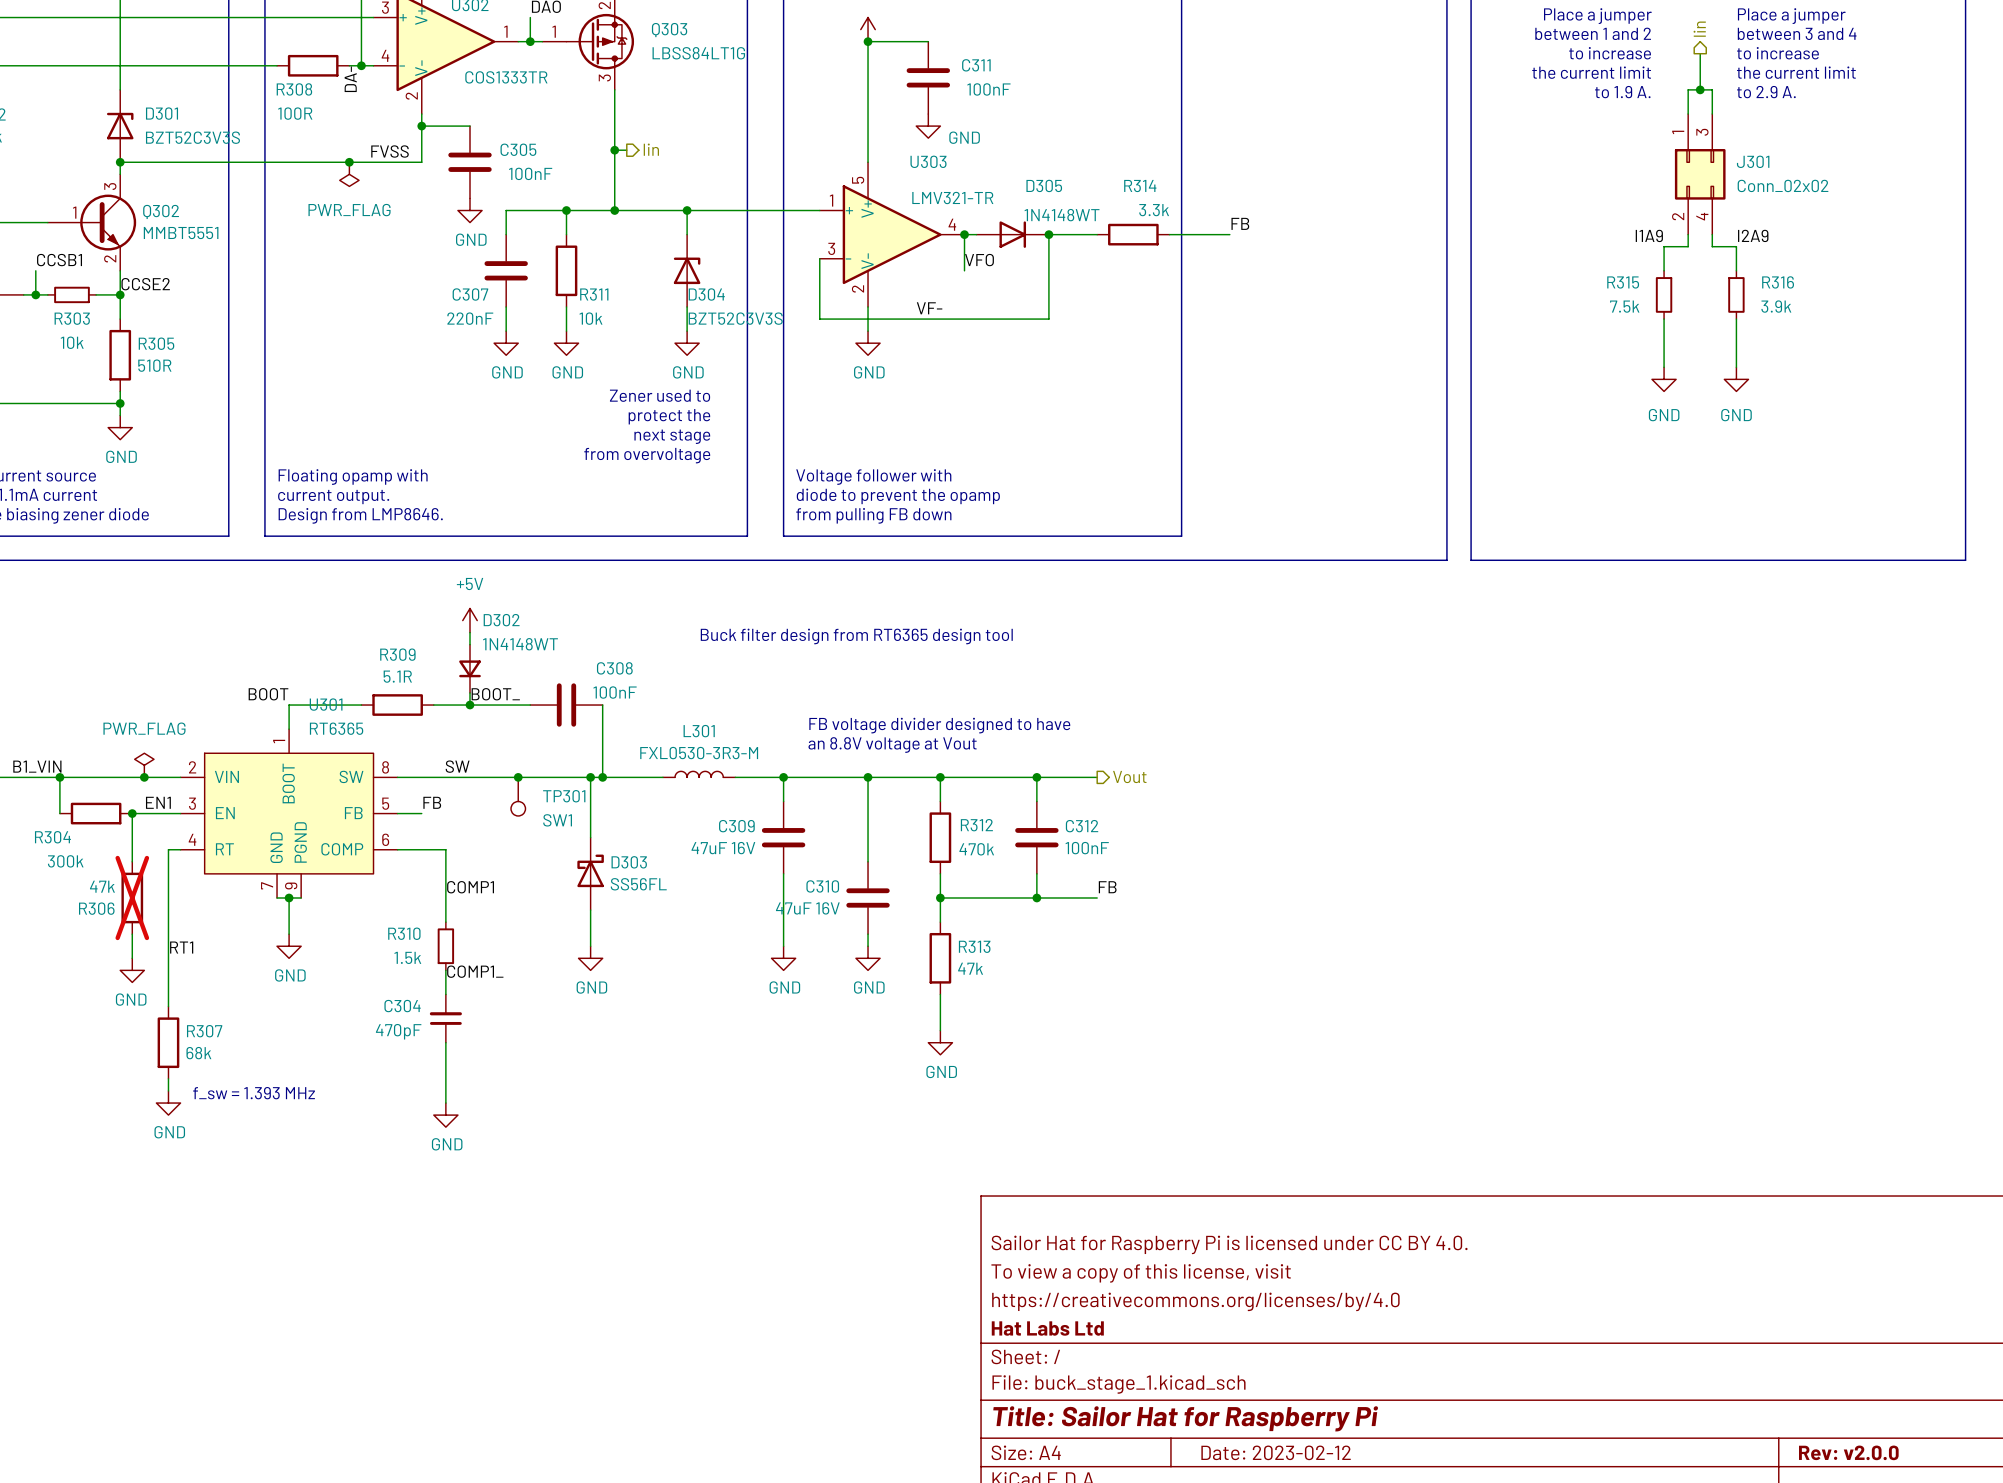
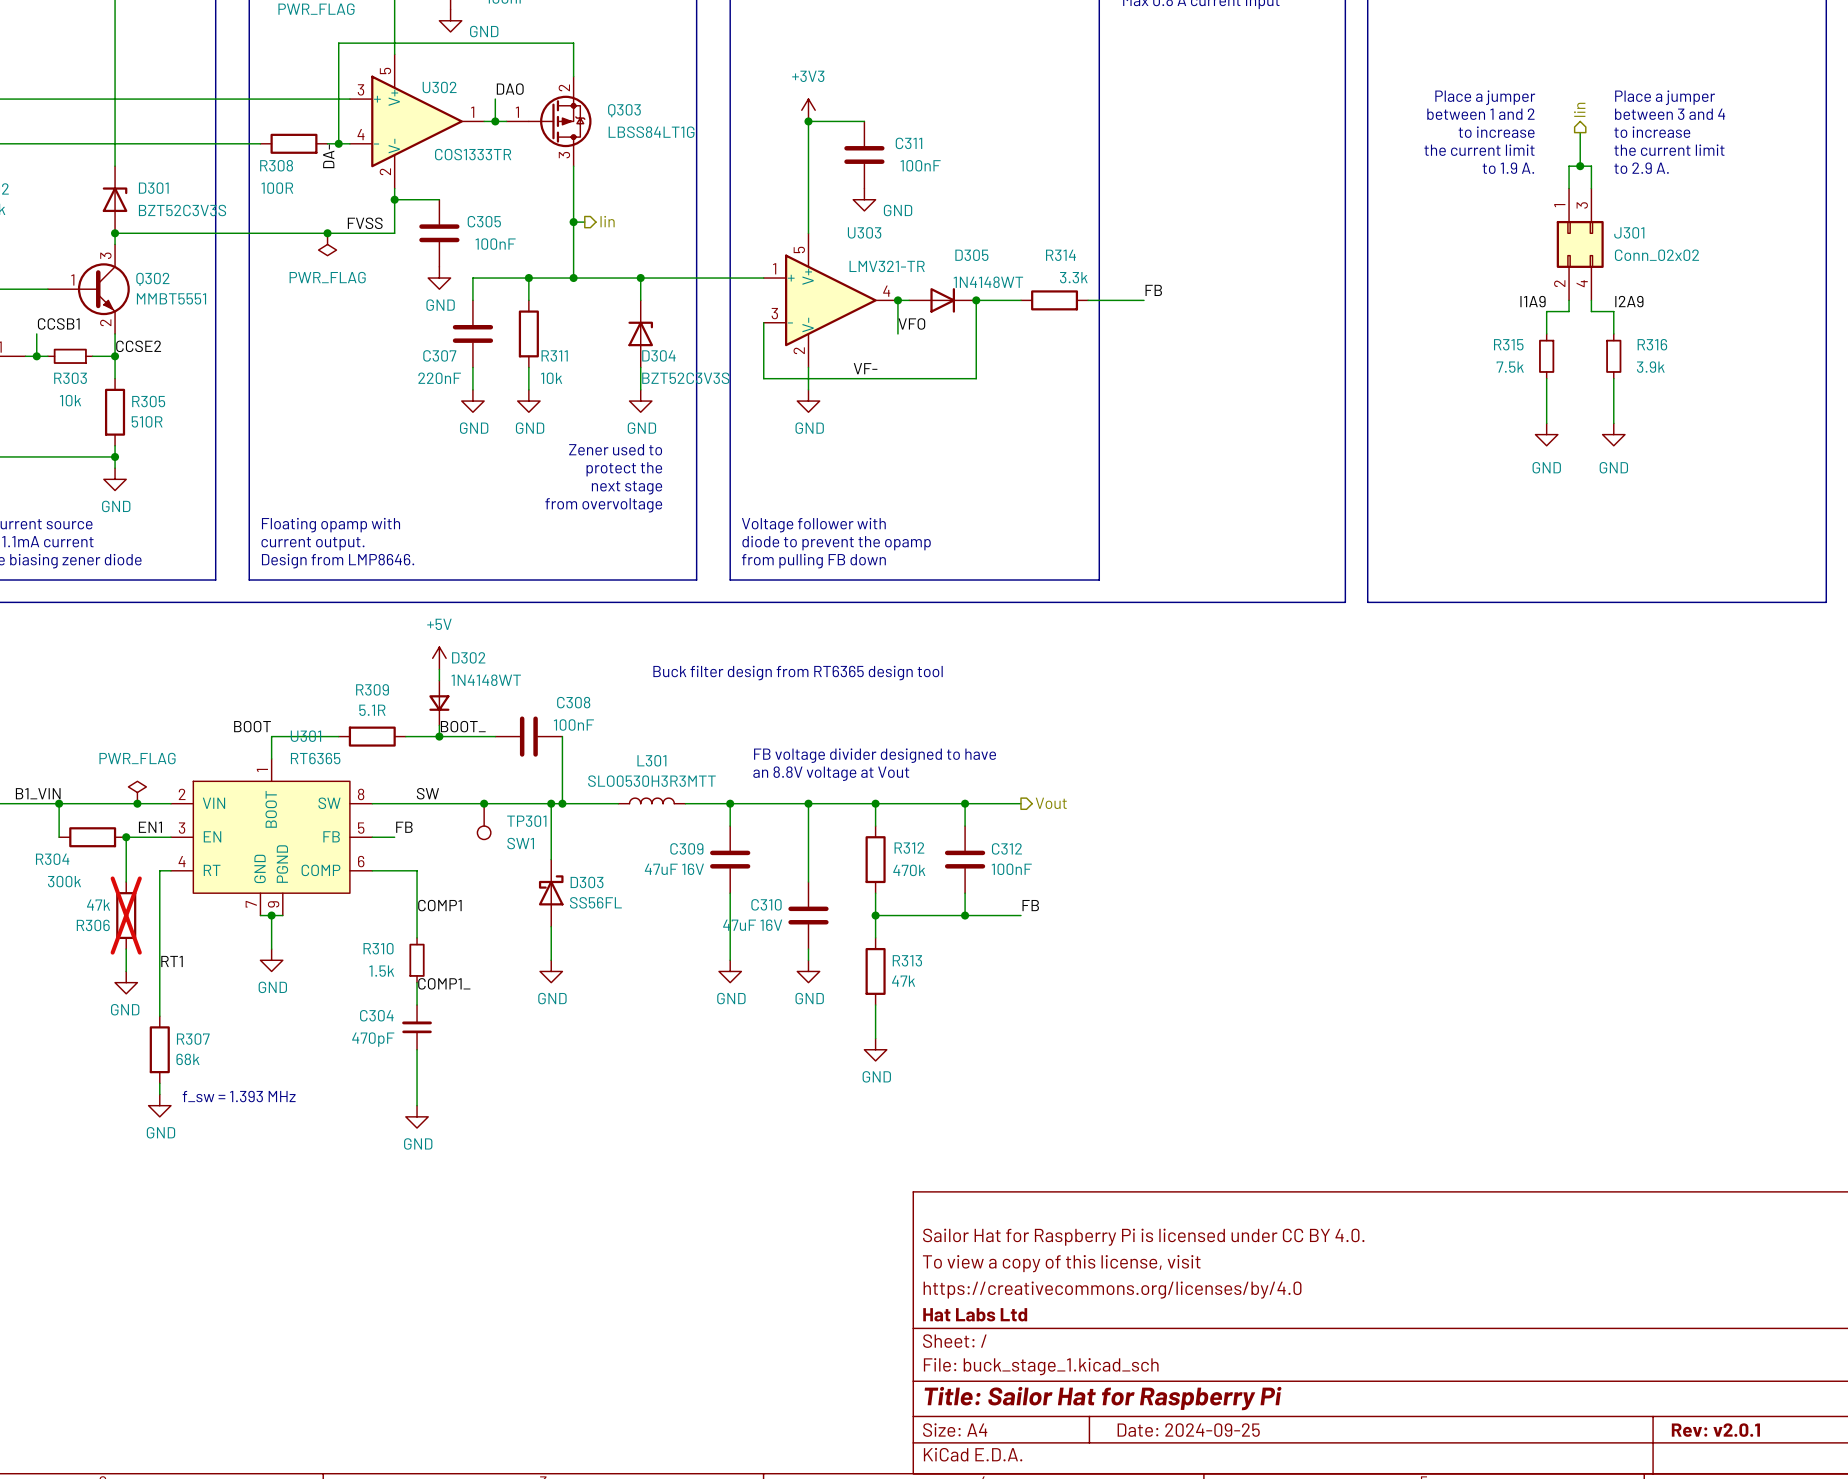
L301 value: FXL0530-3R3-M (699, 753) -> SLO0530H3R3MTT (651, 781)
title block: Date: 2023-02-12 (1276, 1452) -> Date: 2024-09-25 (1188, 1430)
title block: Rev: v2.0.0 (1848, 1452) -> Rev: v2.0.1 (1715, 1430)

